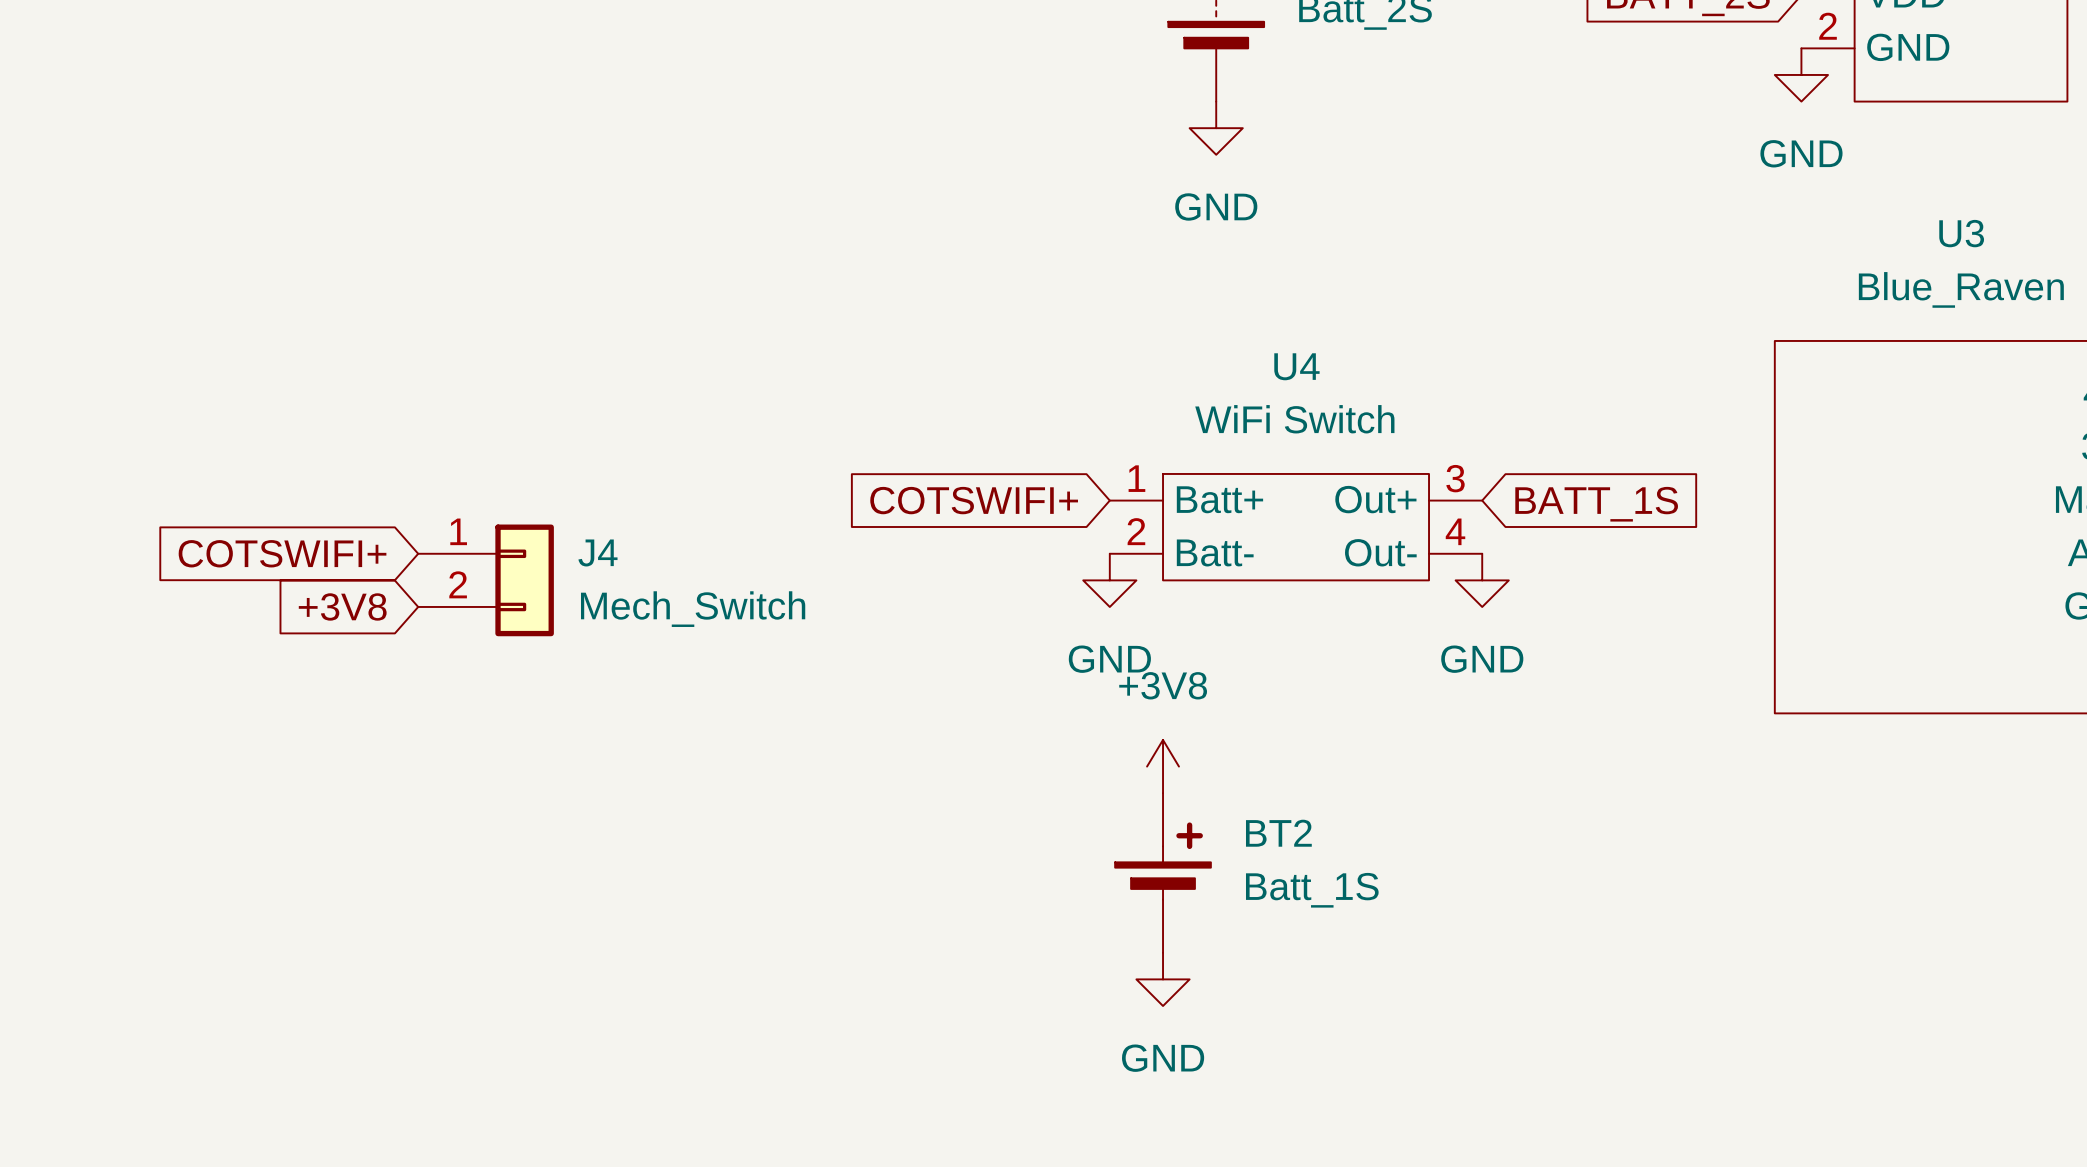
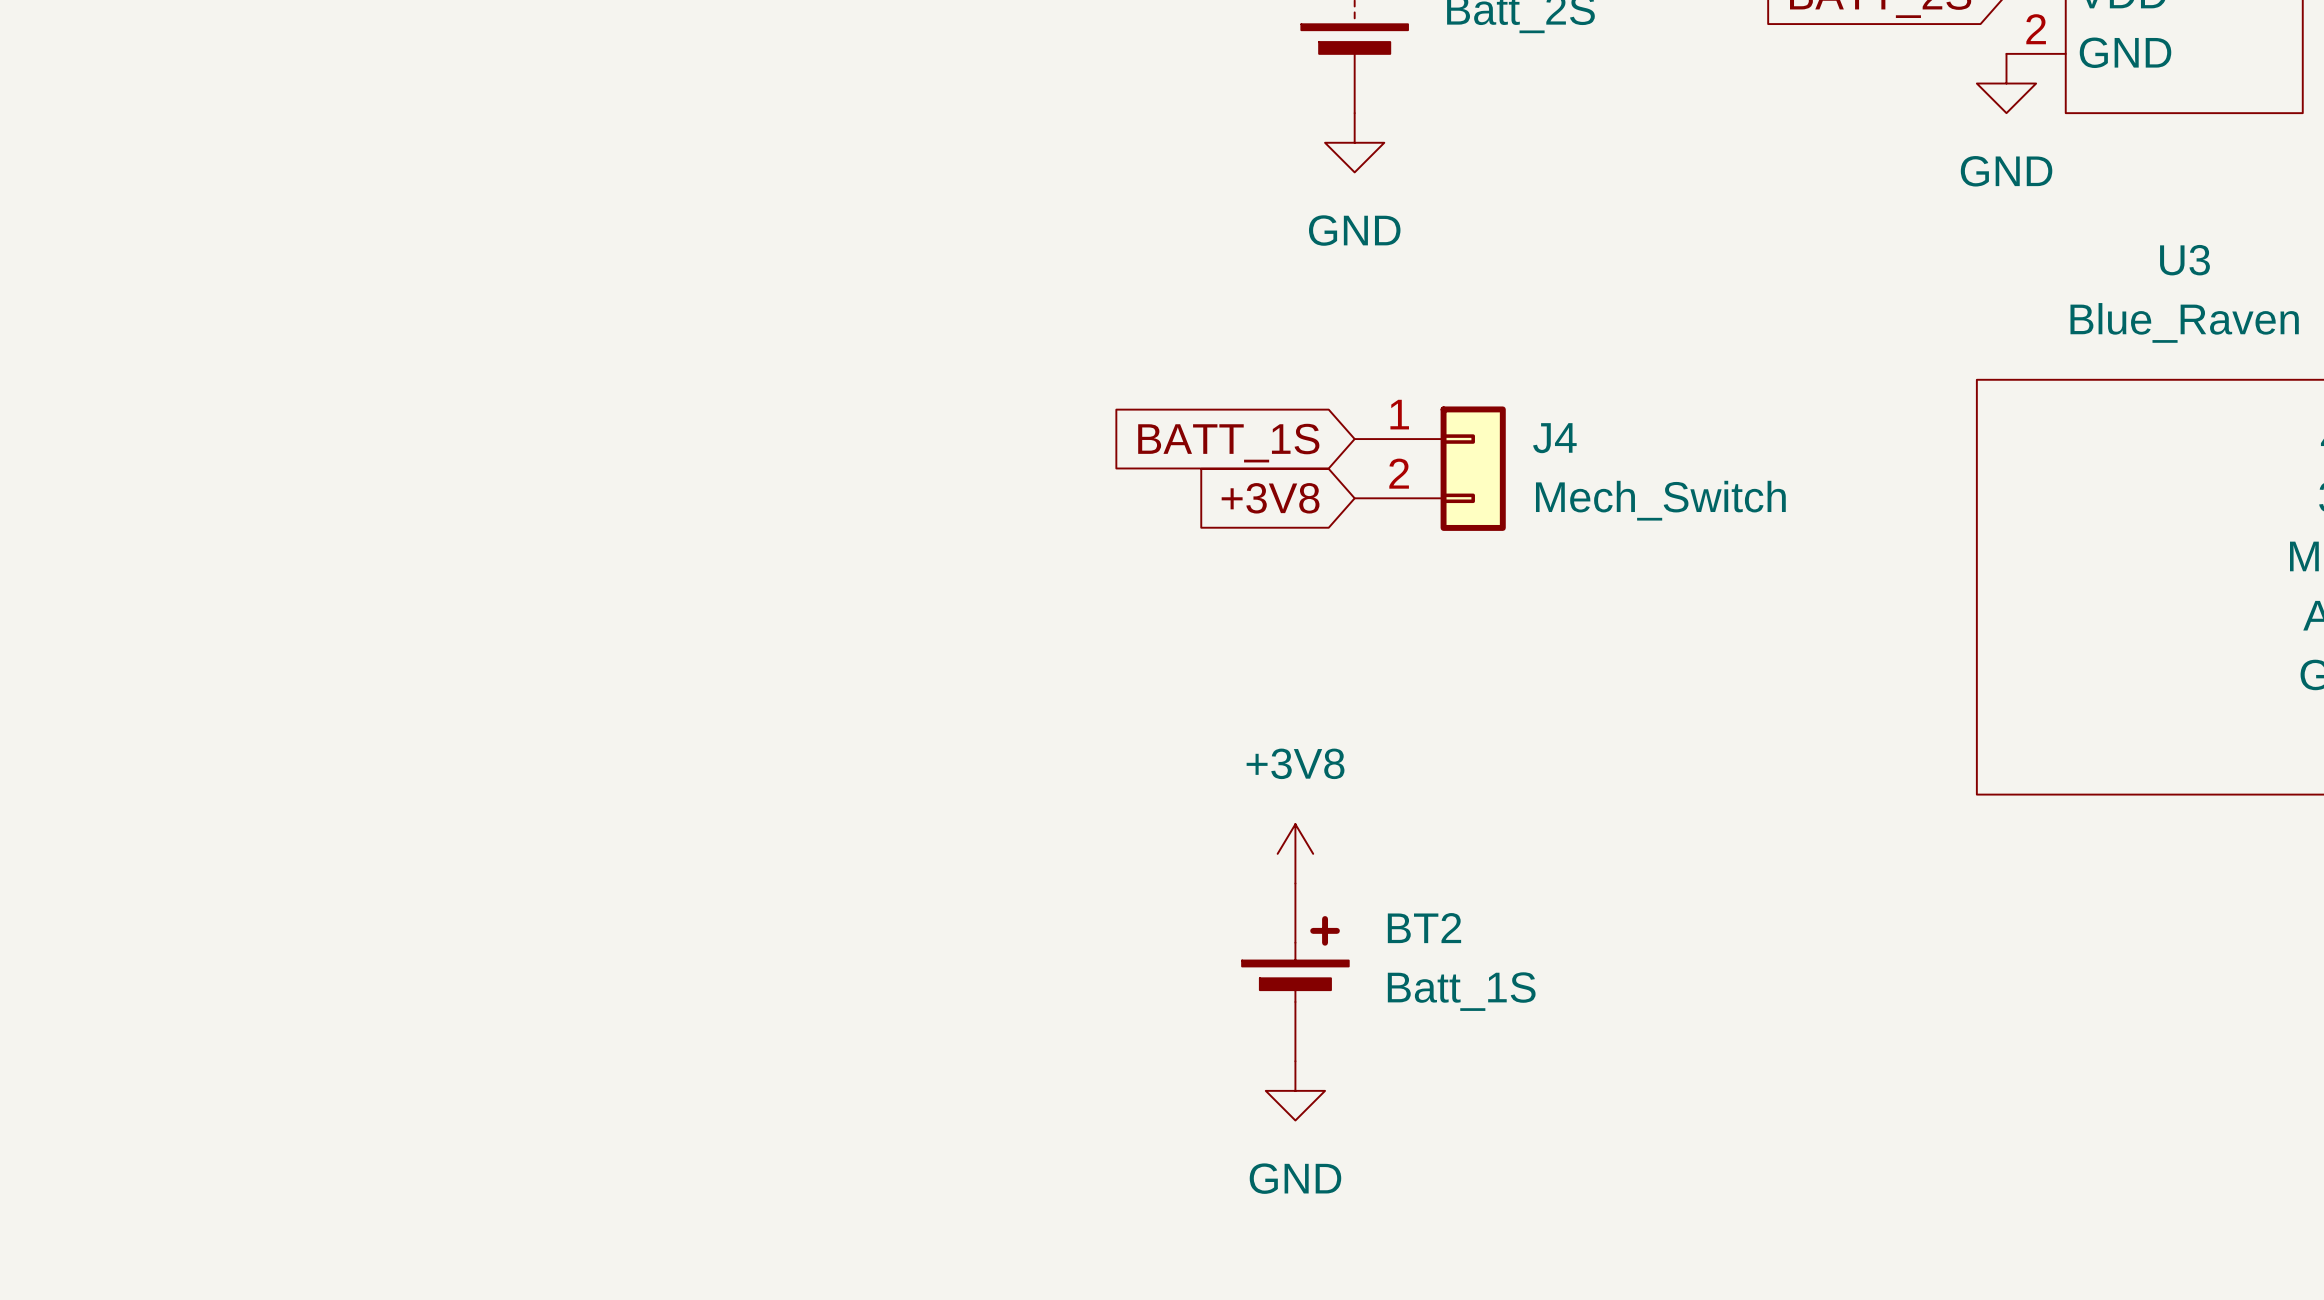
global label: none -> +3V8 (1270, 498)
global label: COTSWIFI+ (974, 500) -> none
global label rotation: 0° (1596, 504) -> 180° (1228, 443)
global label position: BATT_1S (1596, 504) -> BATT_1S (1228, 443)
U4: WiFi Switch (1296, 527) -> none
global label: COTSWIFI+ (282, 553) -> none
J4 position: (486, 580) -> (1430, 468)
power symbol: GND (1109, 580) -> none
power symbol: GND (1482, 580) -> none
global label: +3V8 (342, 606) -> none

